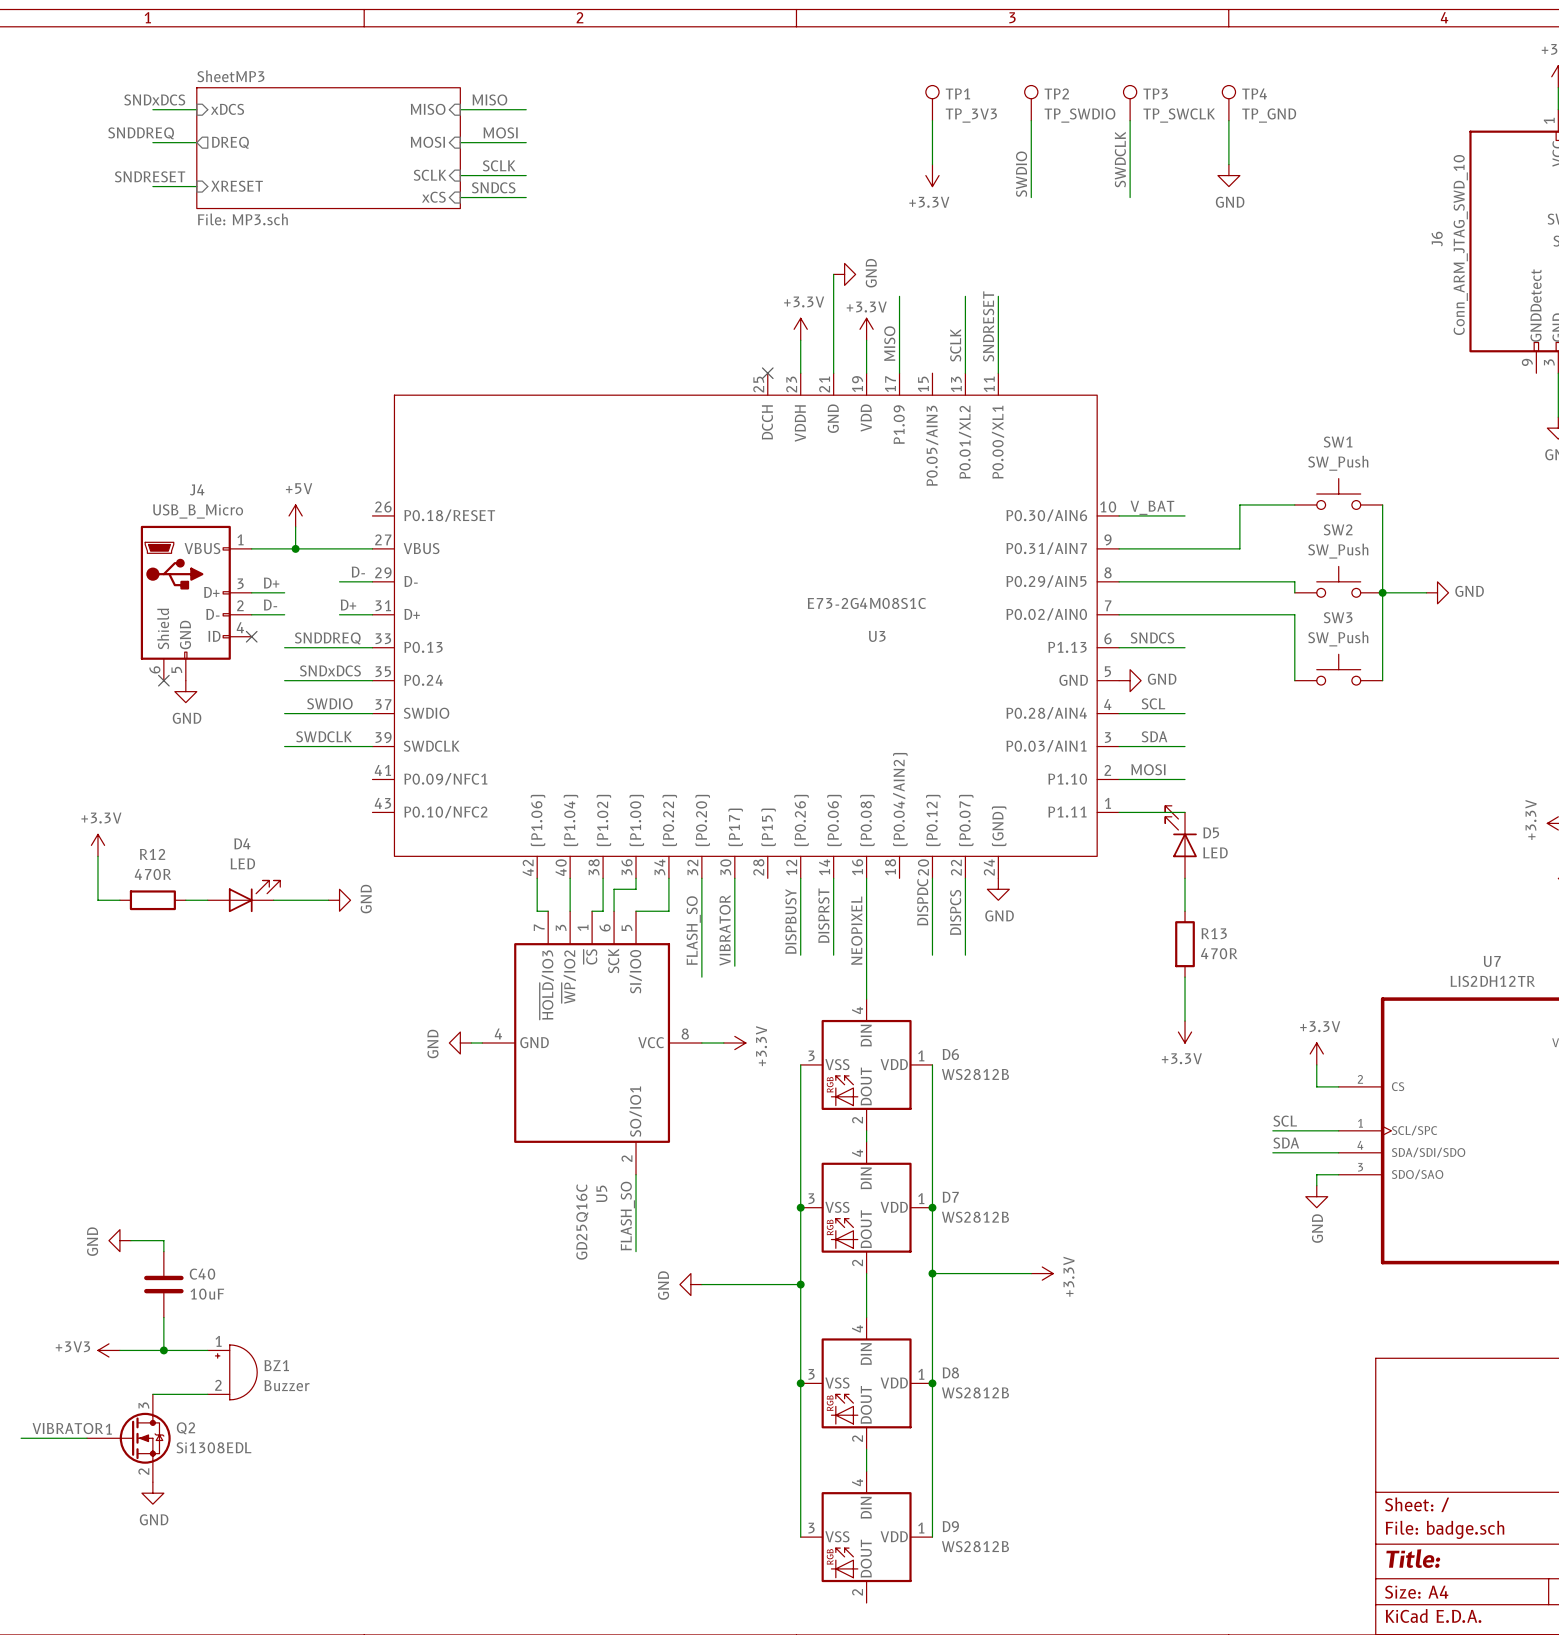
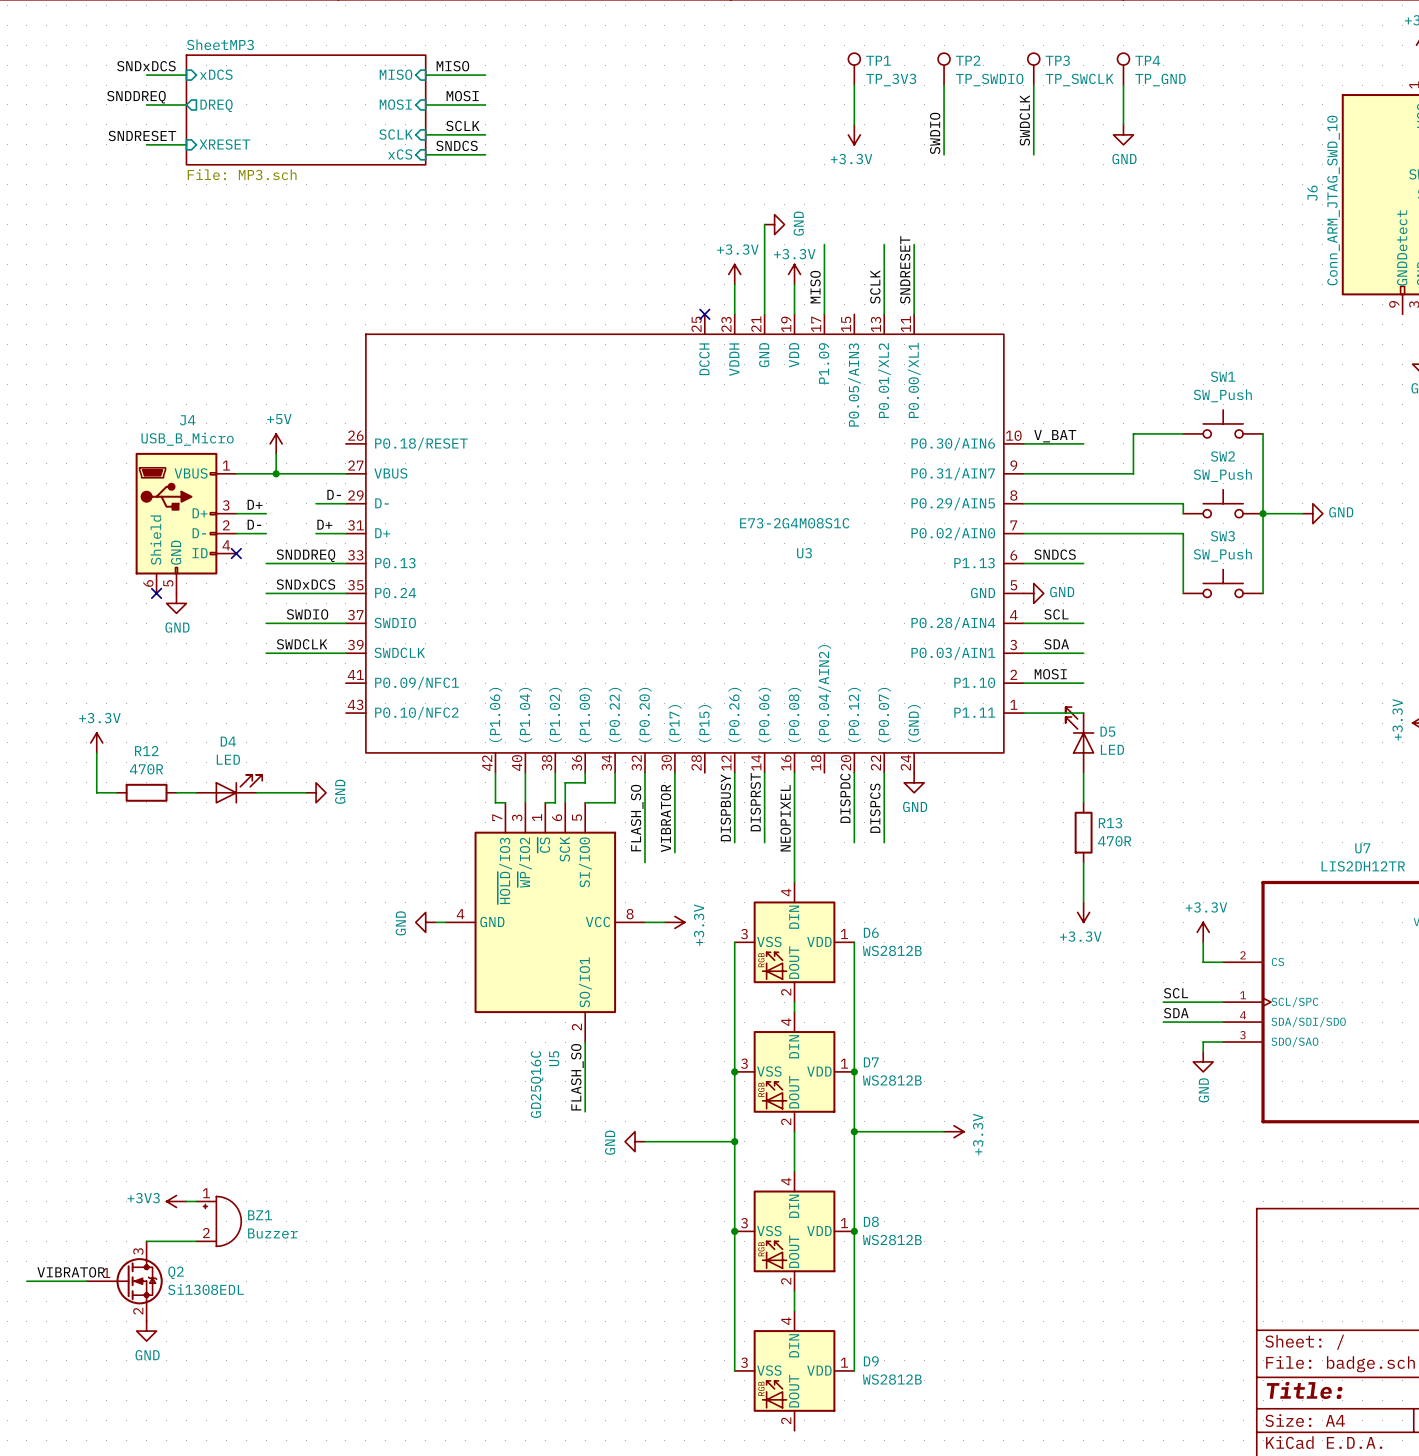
power symbol: GND (119, 1240) -> none
wire: (130, 1240) (163, 1240) (163, 1251) -> none
C40: 10uF (163, 1284) -> none
wire: (163, 1317) (163, 1350) -> none
power symbol position: +3V3 (108, 1350) -> +3V3 (176, 1201)
wire: (119, 1350) (196, 1350) -> none
junction: (163, 1350) -> none

